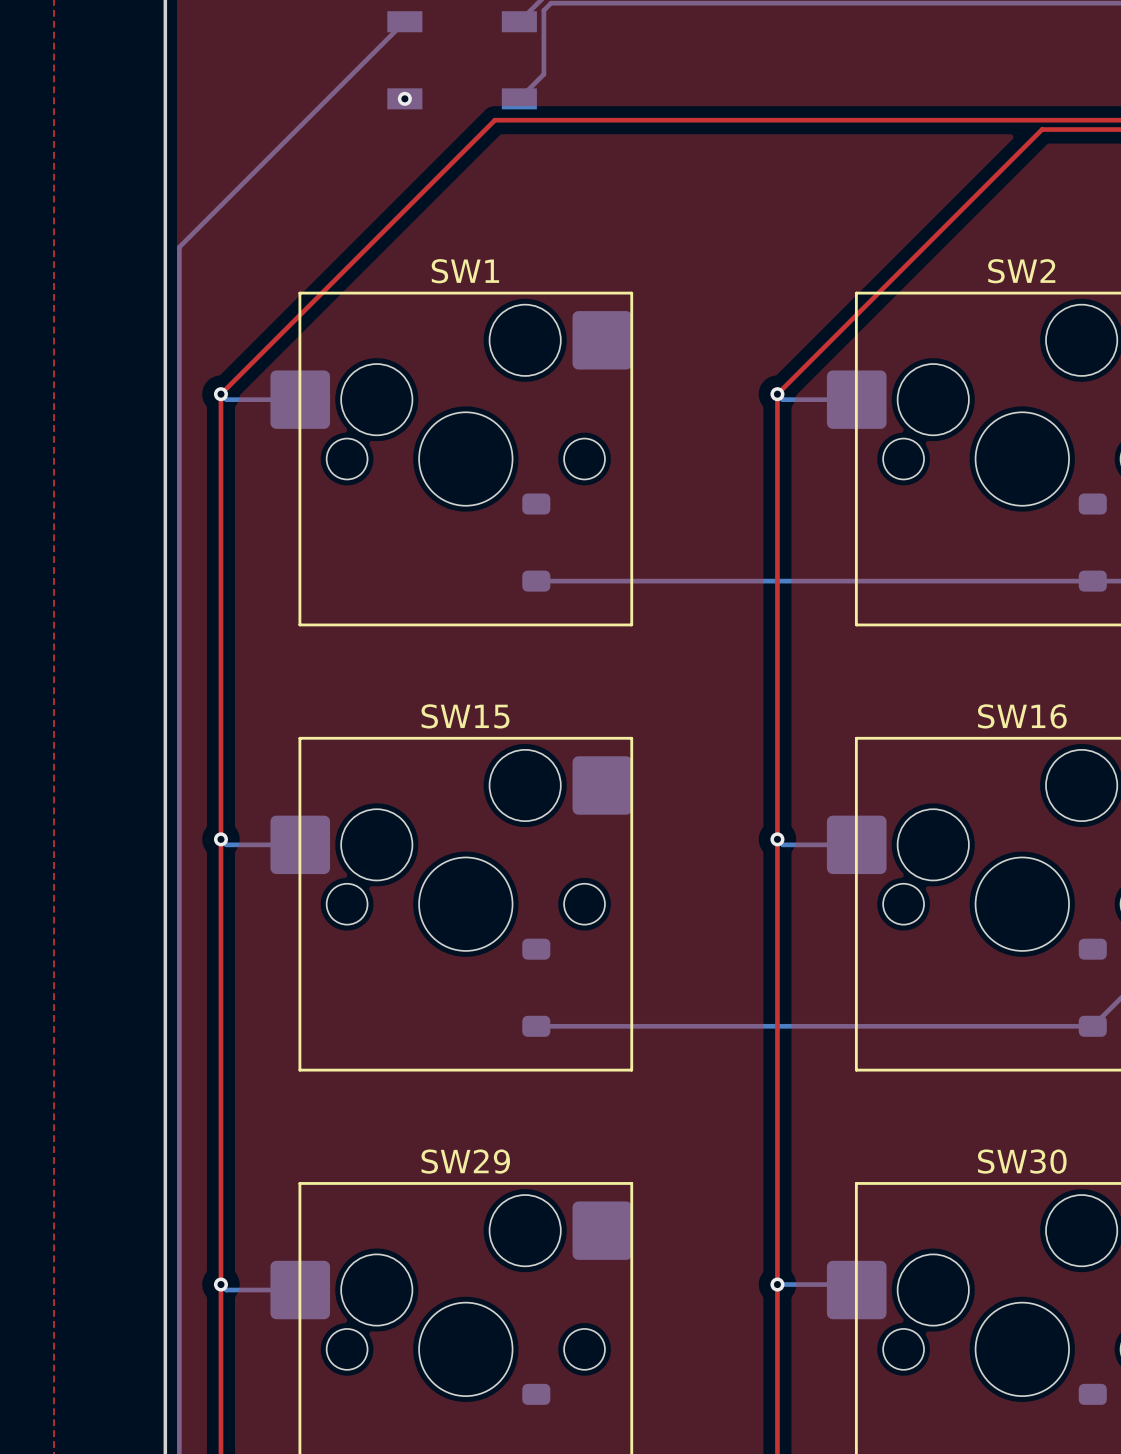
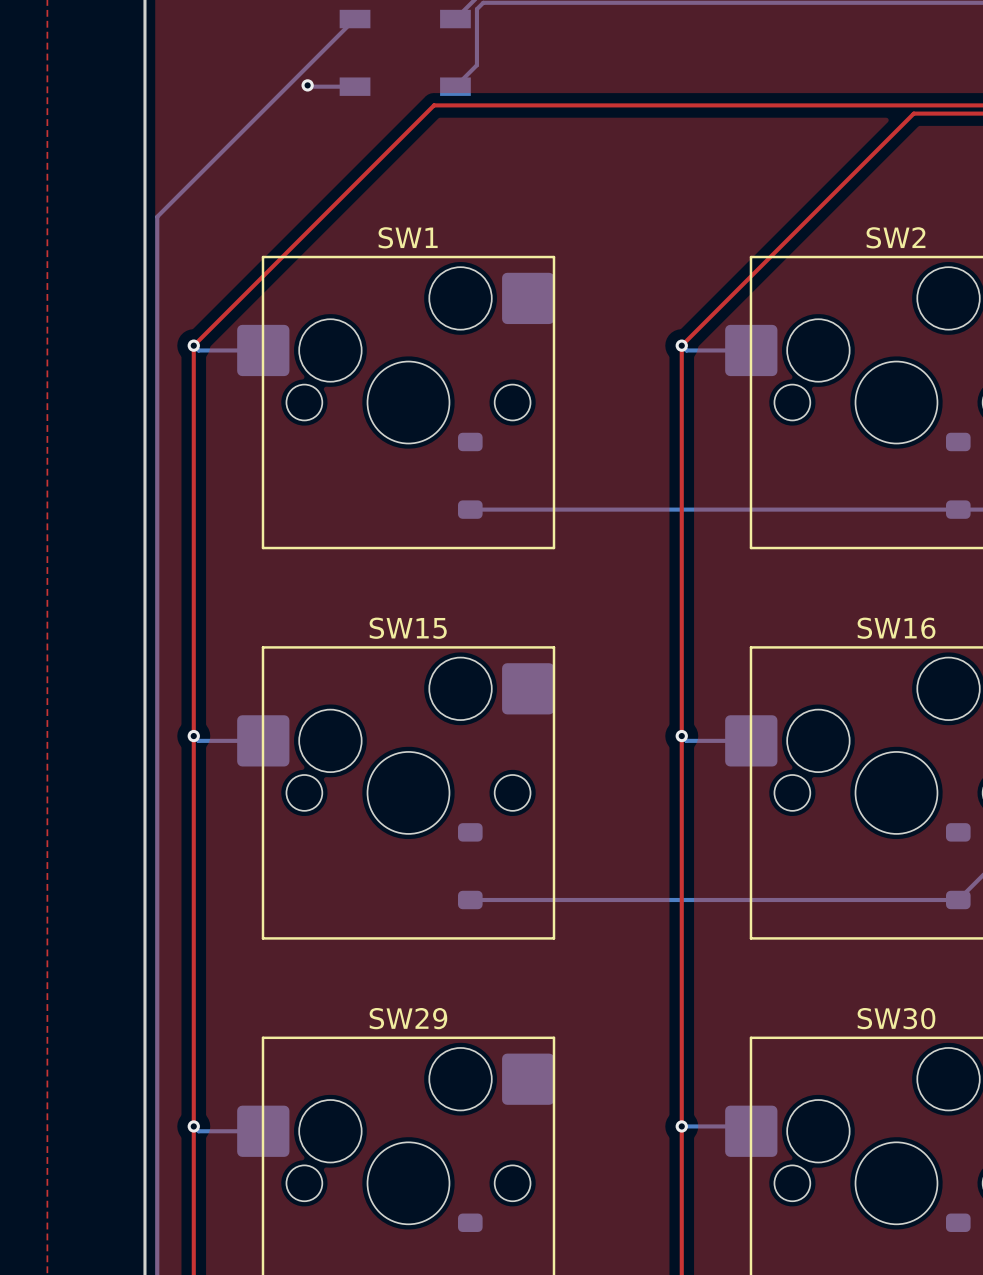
bottom track: none -> (307, 85) (355, 86)
via position: (404, 98) -> (307, 85)

